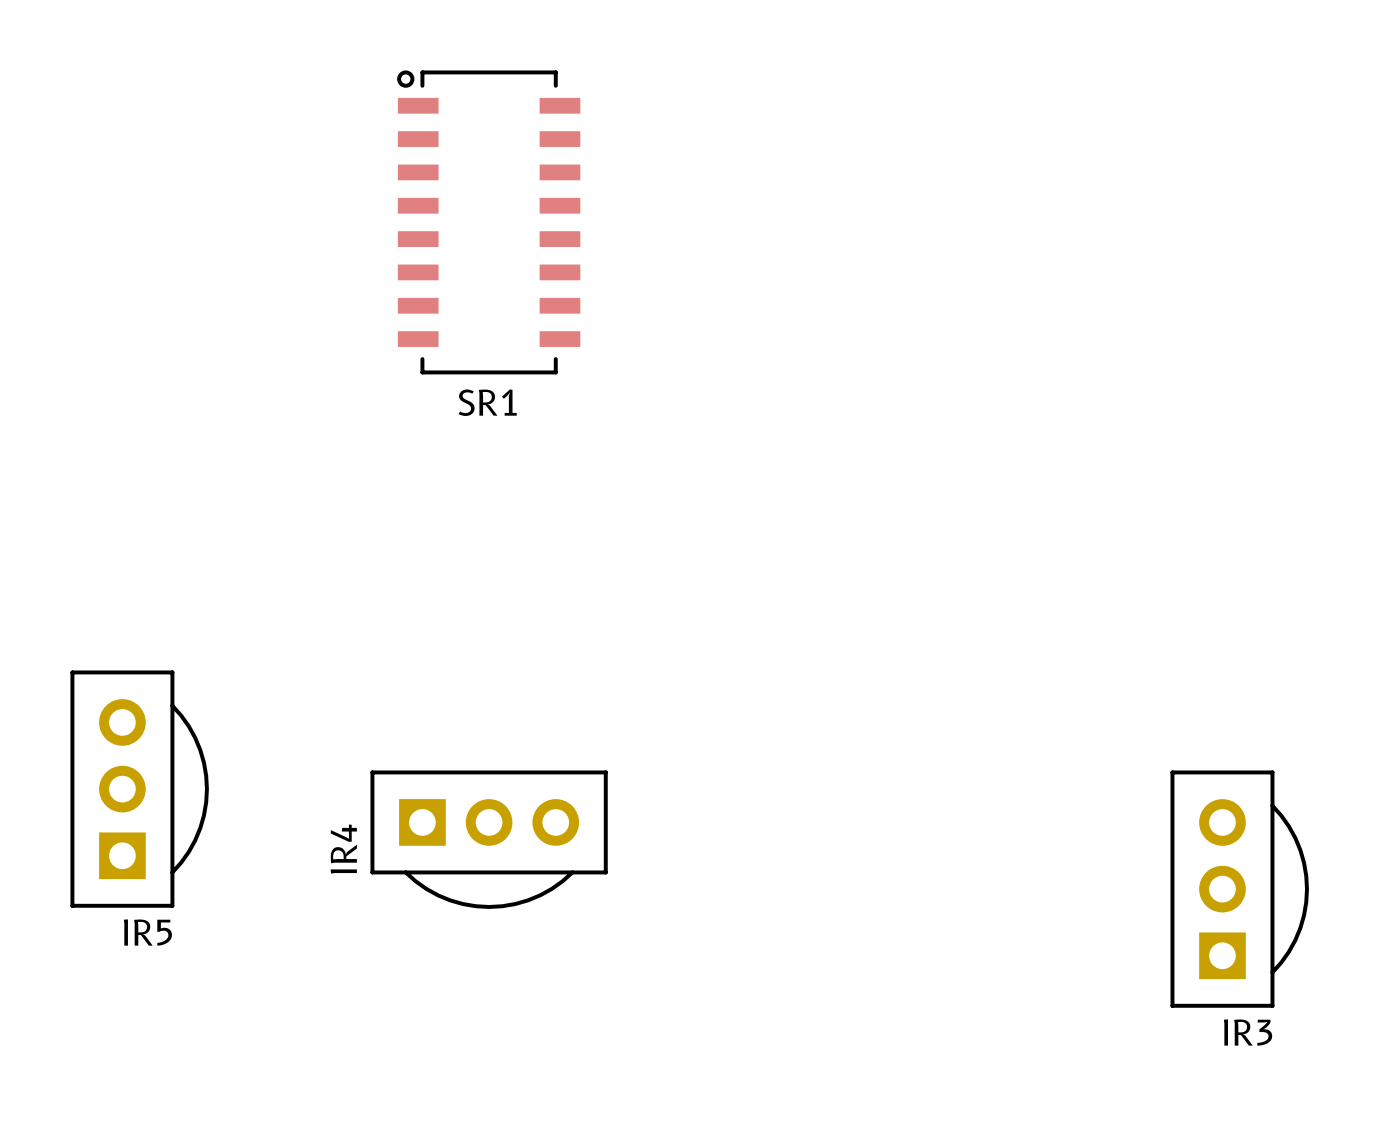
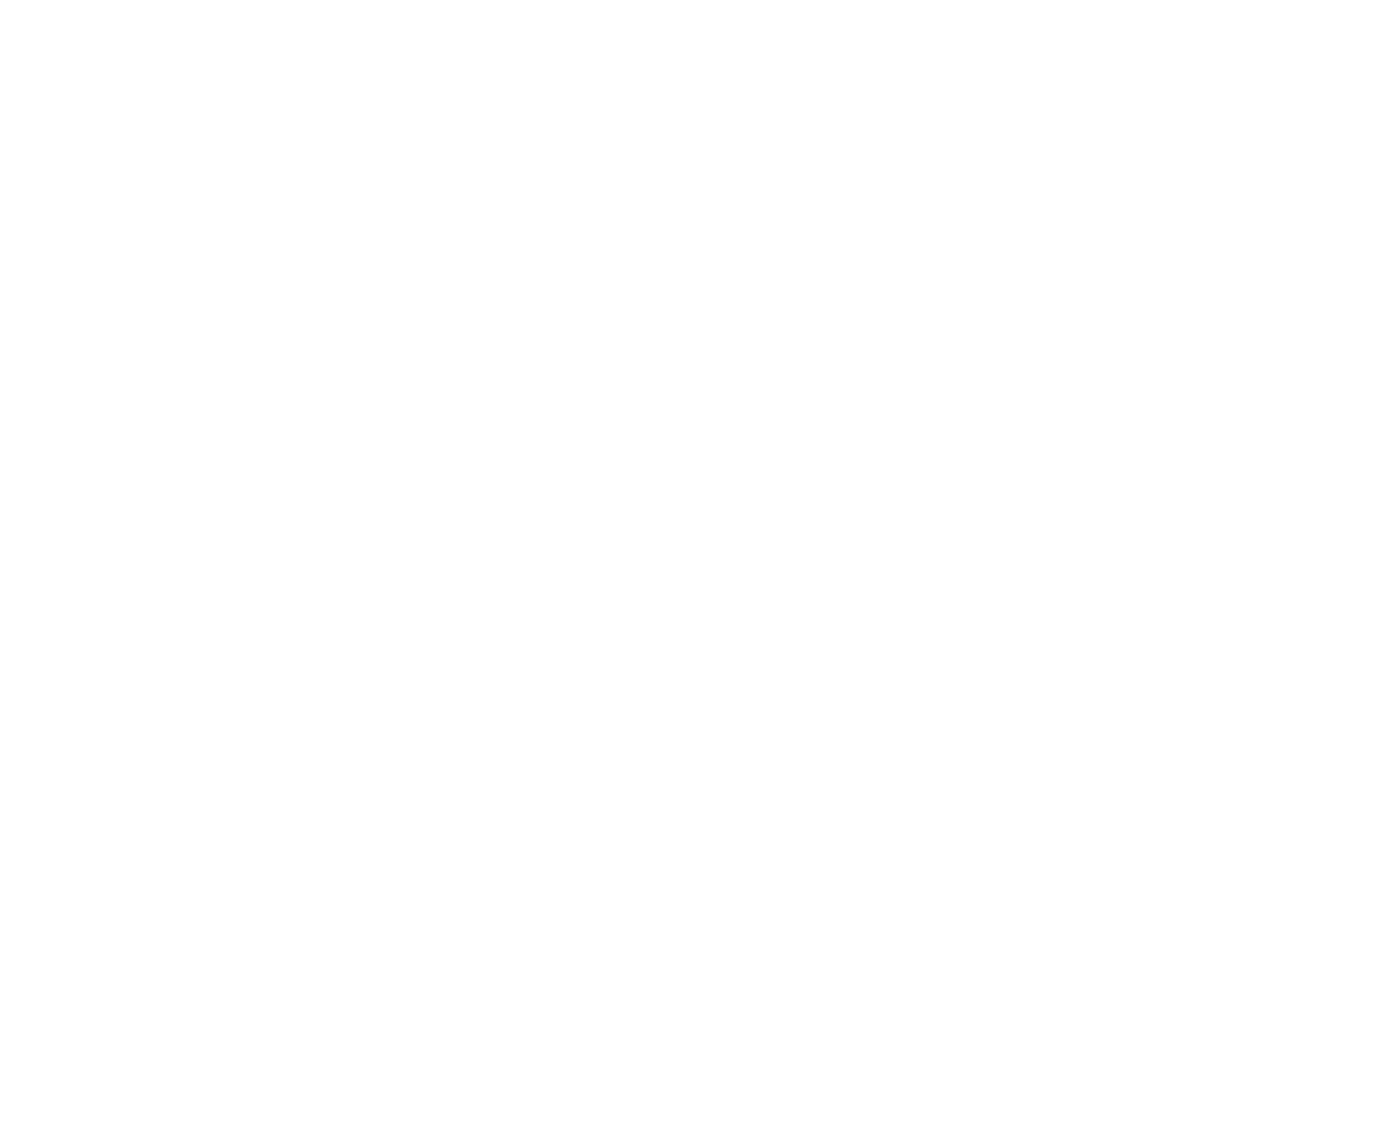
SR1: (488, 222) -> none
IR5: (139, 789) -> none
IR4: (489, 839) -> none
IR3: (1239, 889) -> none

